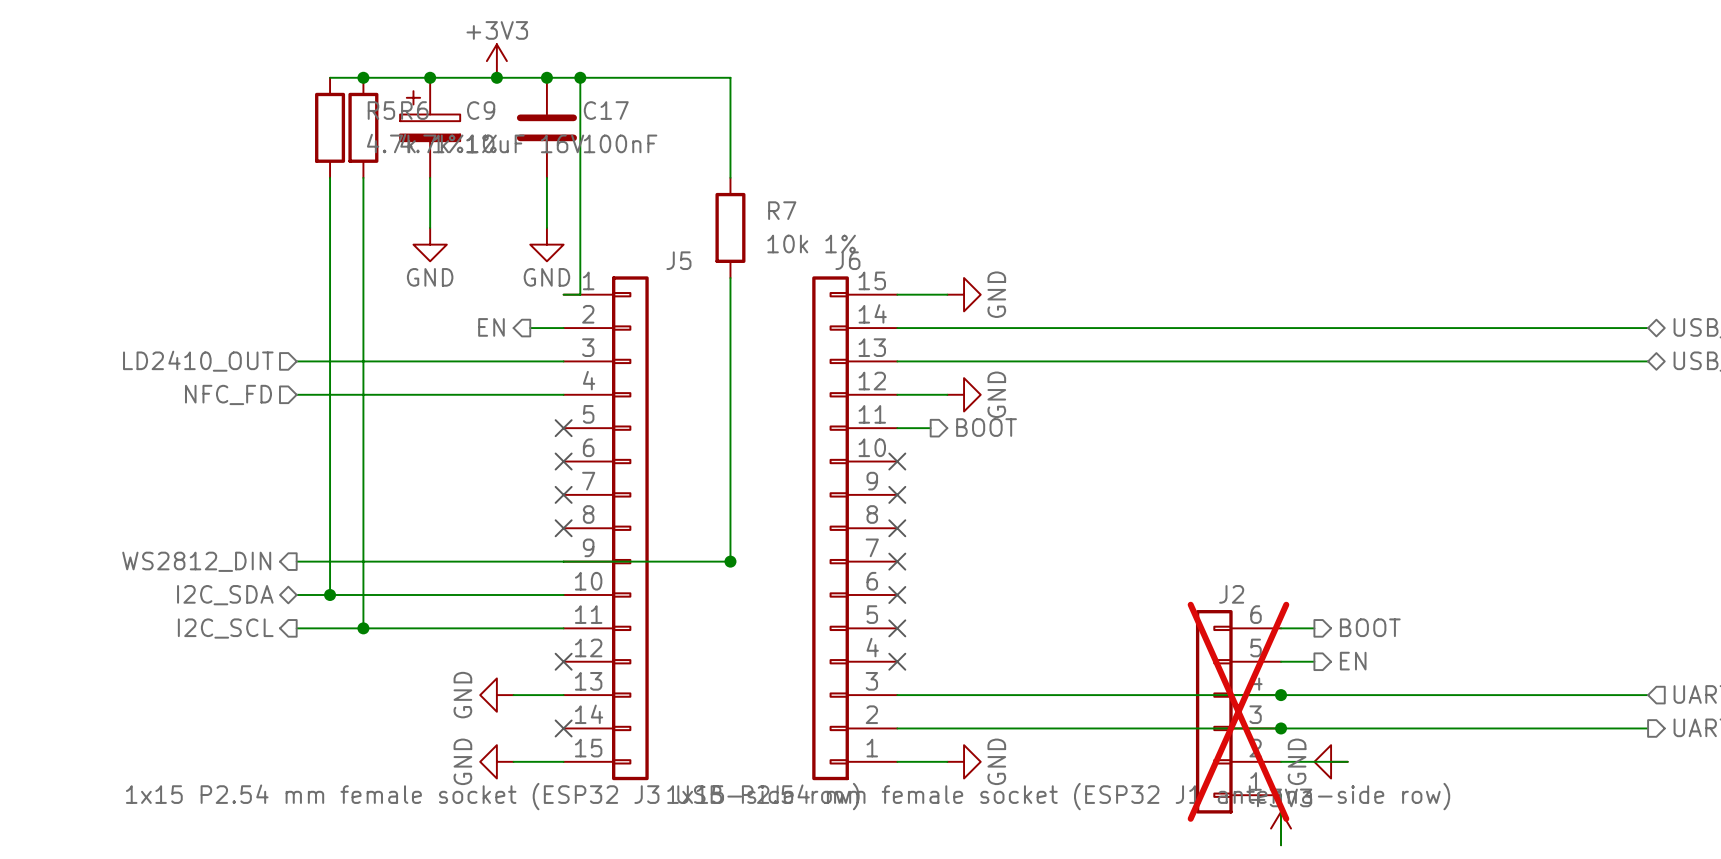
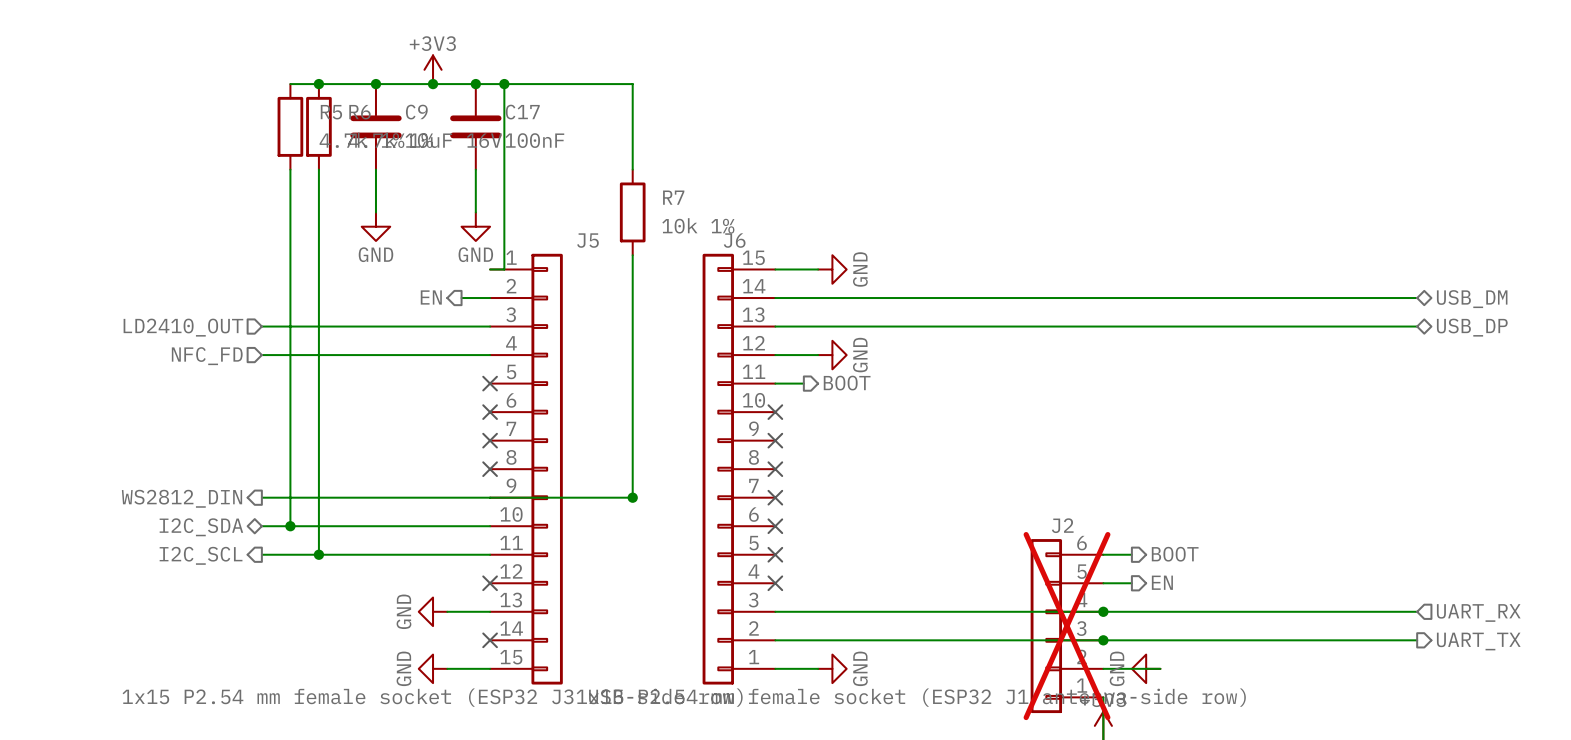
C9 symbol: [400, 77, 461, 178] -> [350, 84, 402, 170]

